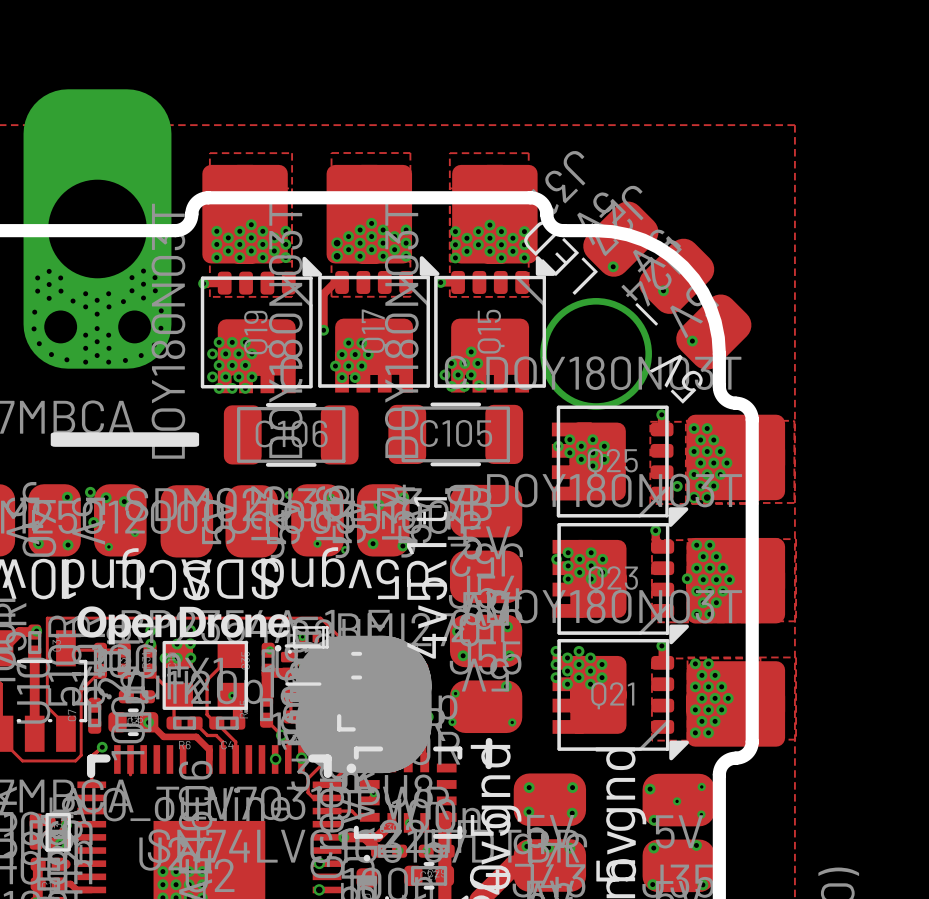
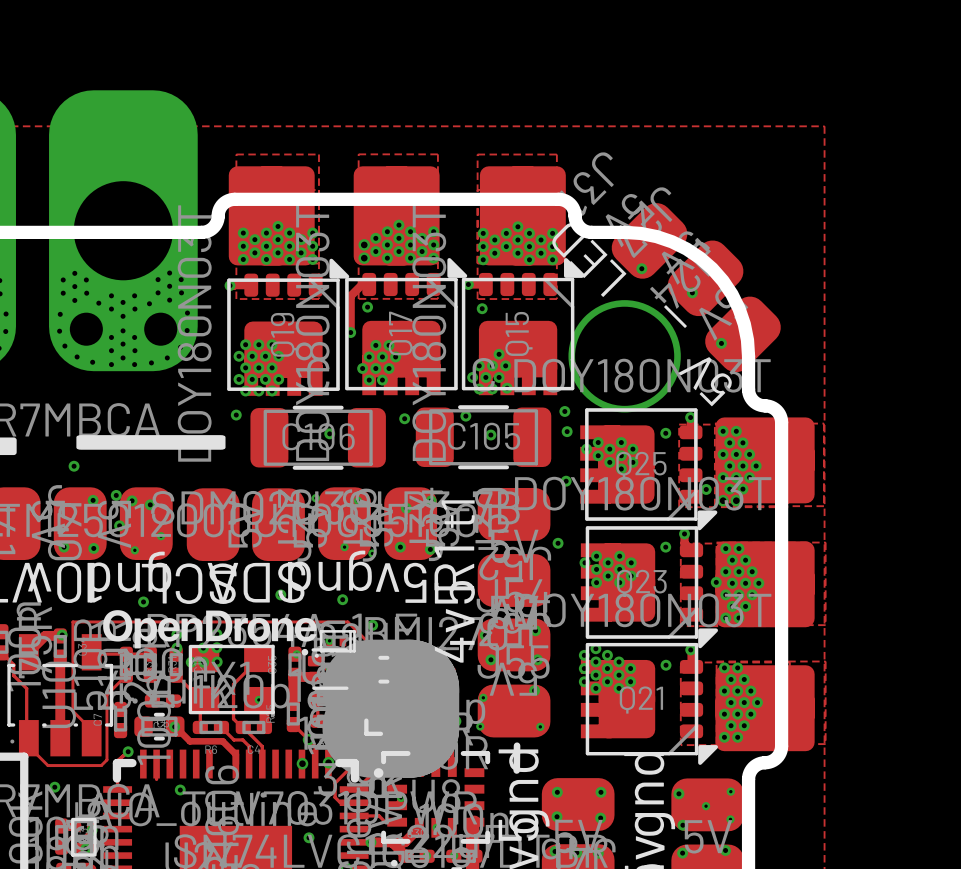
via: none -> (367, 307)
via: none -> (482, 308)
via: none -> (564, 411)
via: none -> (236, 415)
via: none -> (465, 416)
via: none -> (404, 418)
via: none -> (567, 431)
via: none -> (665, 433)
via: none -> (329, 433)
via: none -> (490, 435)
via: none -> (74, 466)
via: none -> (566, 481)
via: none -> (558, 543)
via: none -> (665, 547)
via: none -> (280, 594)
via: none -> (342, 599)
via: none -> (143, 601)
via: none -> (372, 625)
via: none -> (595, 648)
via: none -> (666, 665)
via: none -> (54, 787)
via: none -> (180, 790)
via: none -> (309, 837)

